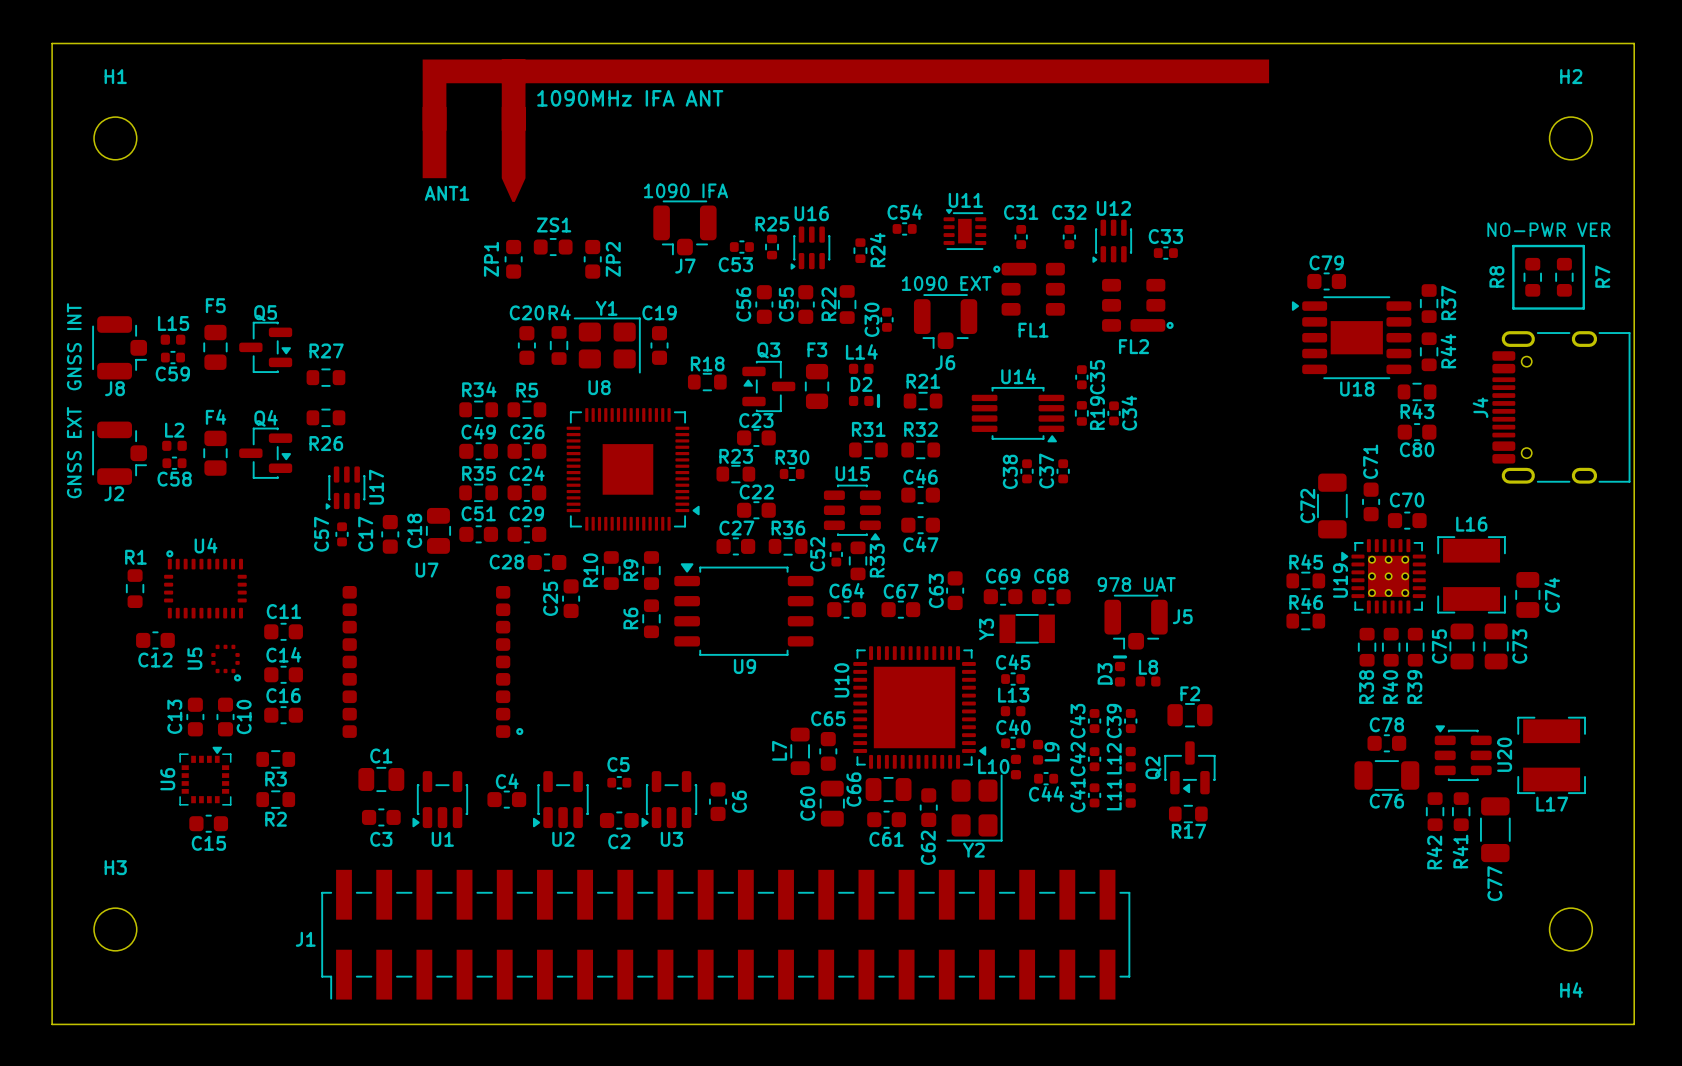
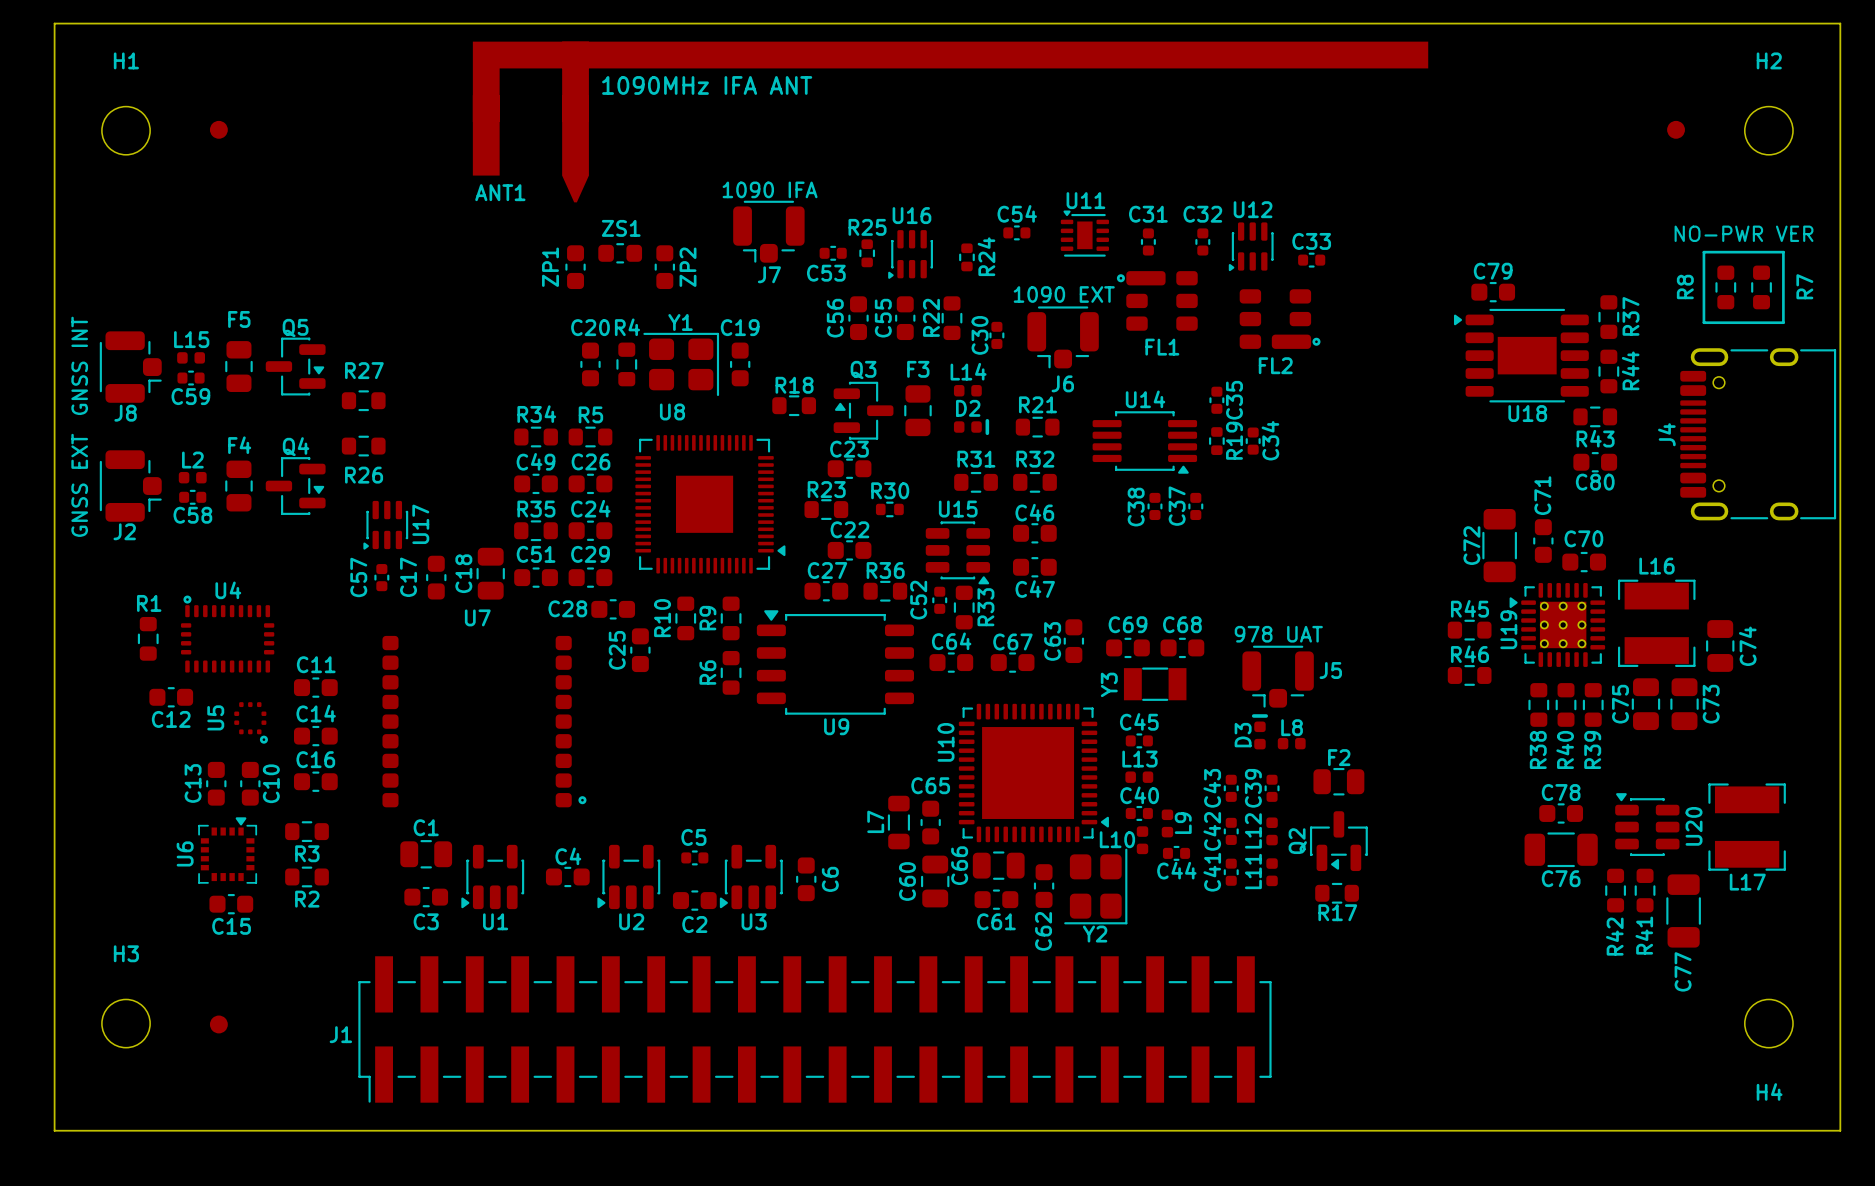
part: none -> (218, 129)
part: none -> (1676, 129)
part: none -> (218, 1024)

